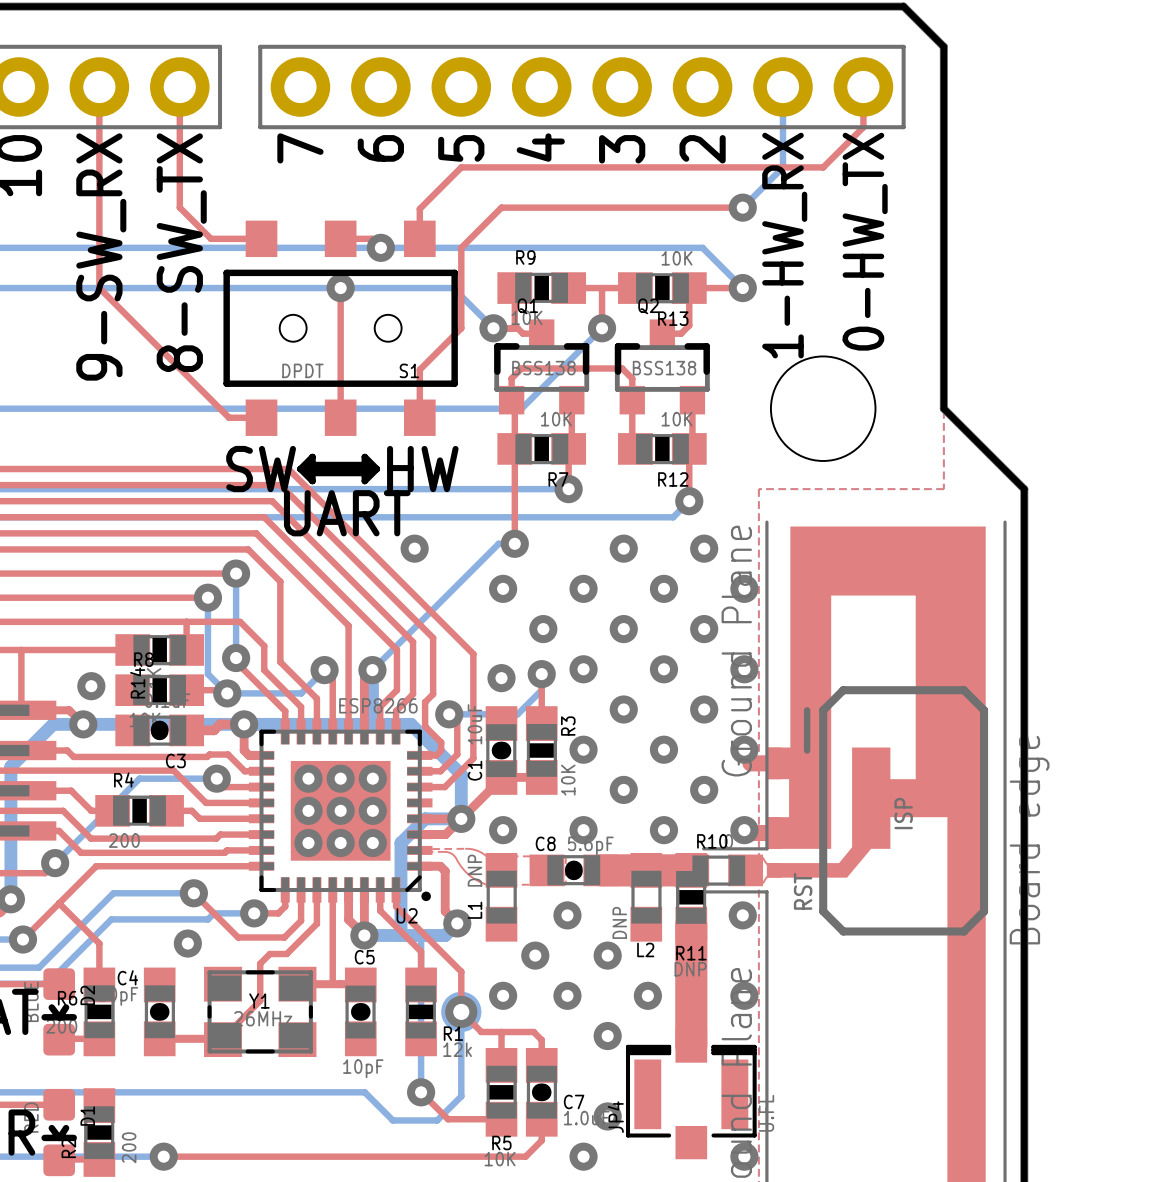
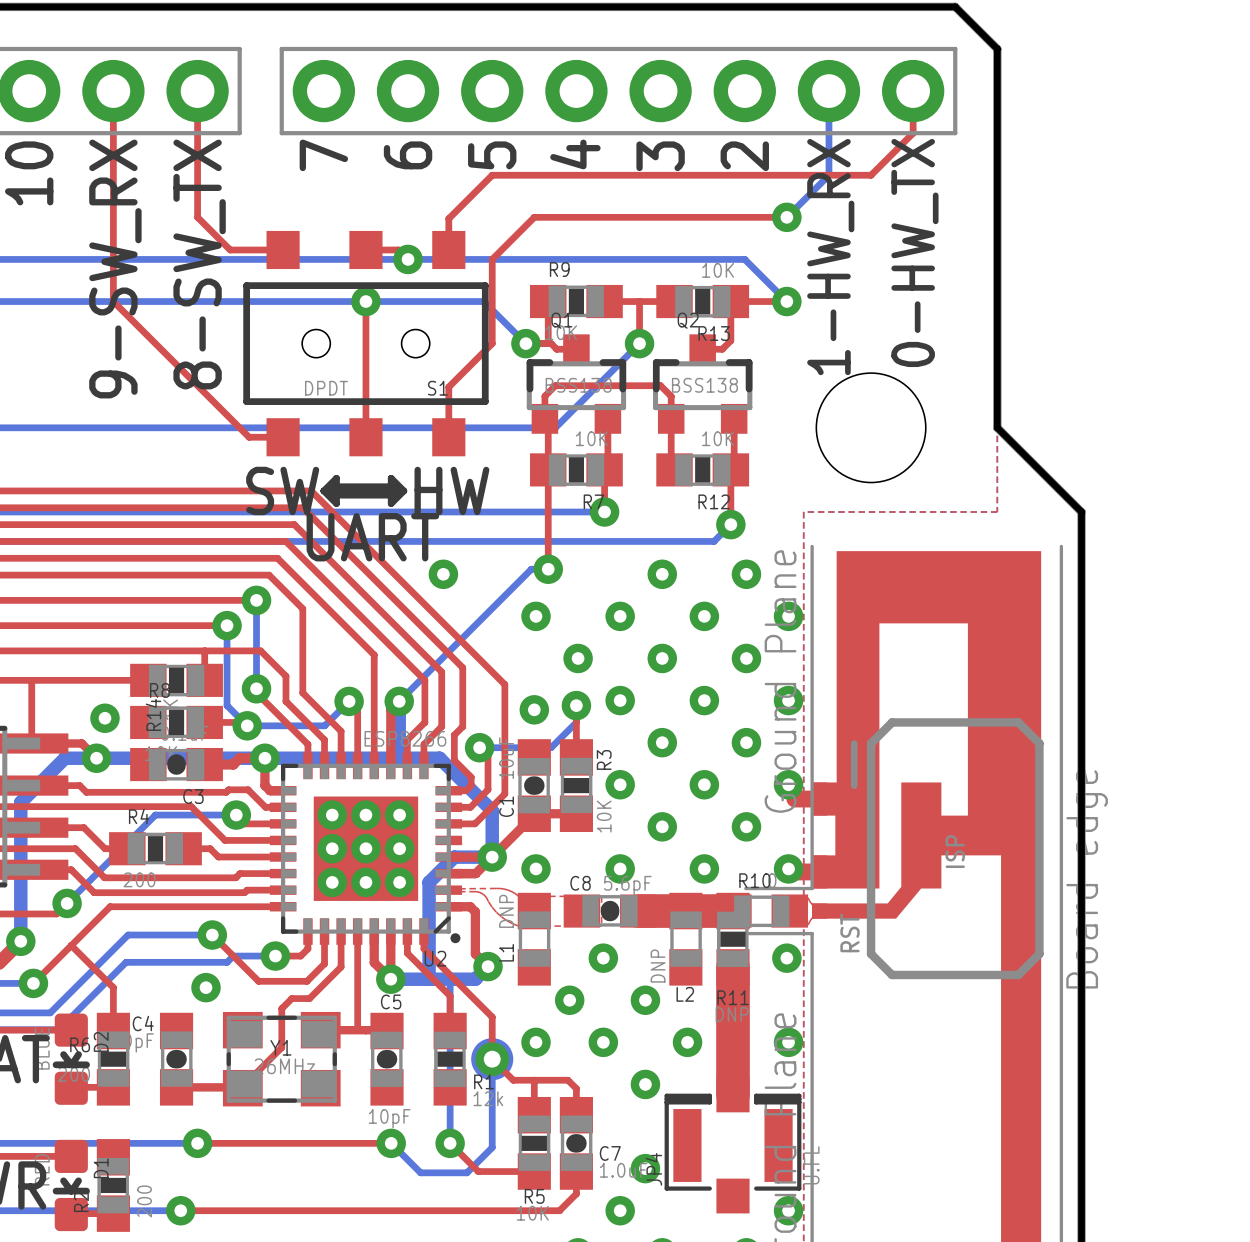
top track: none -> (197, 1143) (391, 1143)
bottom track: (179, 1092) (364, 1092) -> none
via: none -> (197, 1143)
via: none -> (391, 1143)

